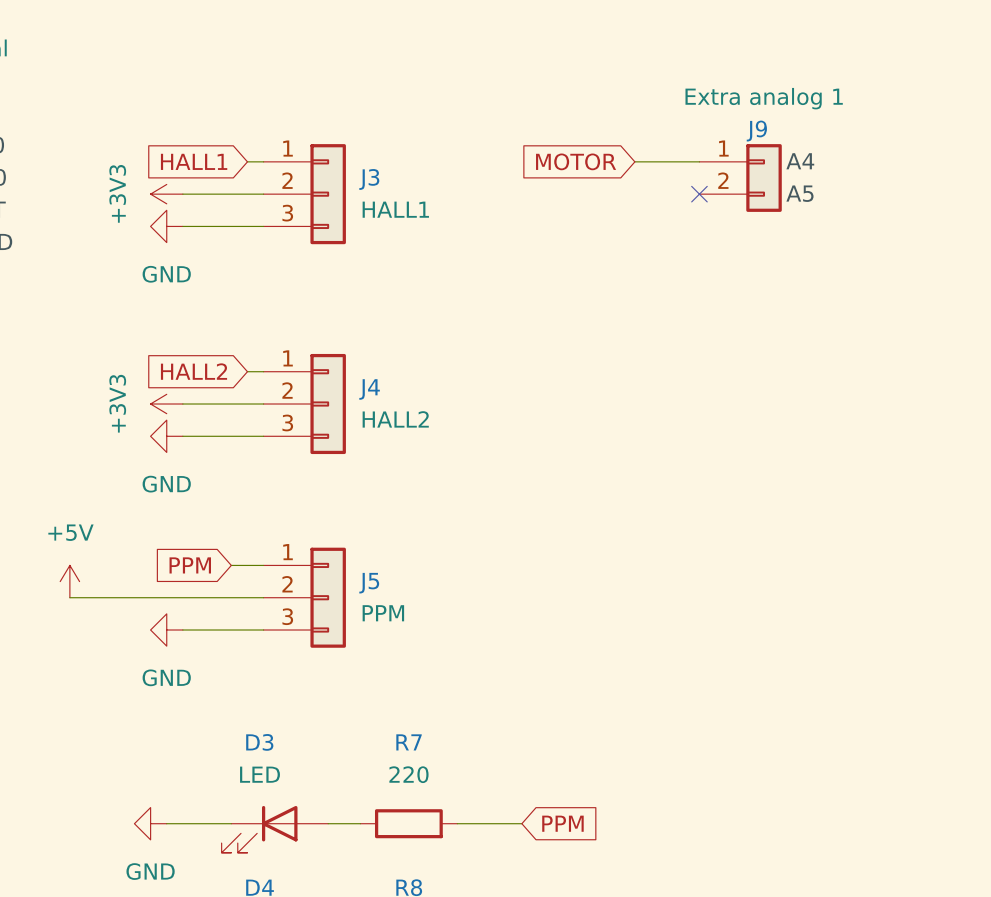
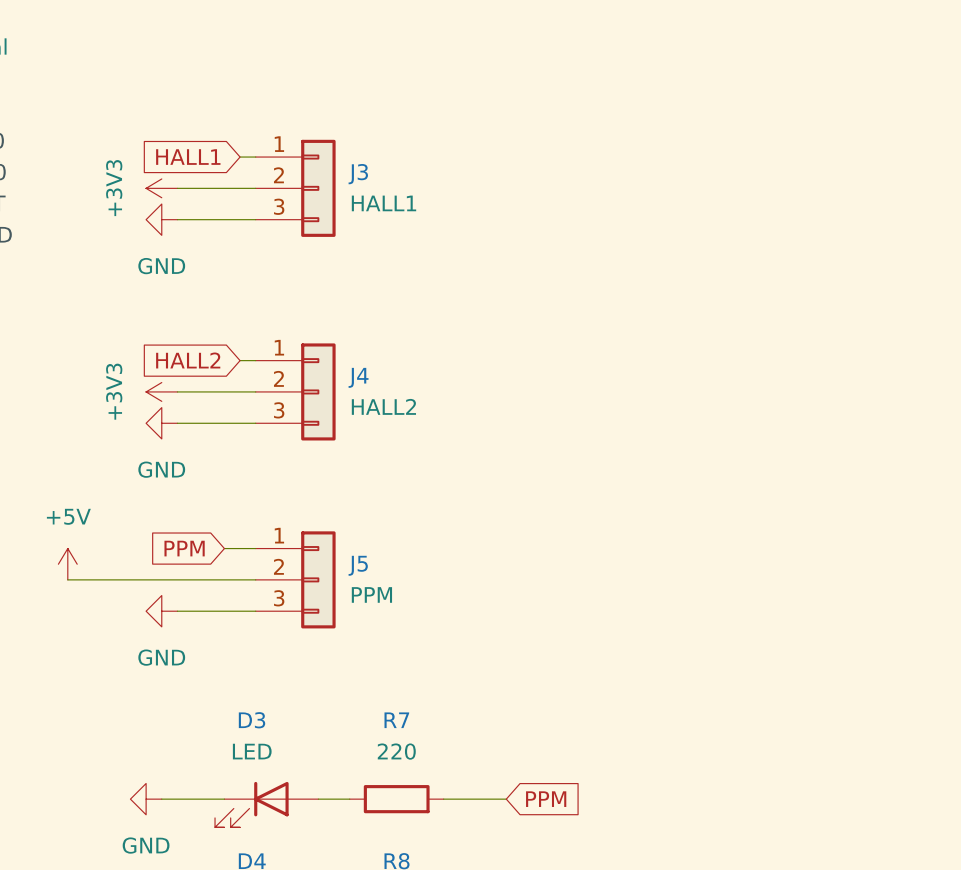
global label: MOTOR (576, 161) -> none
wire: (634, 161) (699, 161) -> none
J9: Extra analog 1 (740, 178) -> none
no-connect mark: (699, 194) -> none

